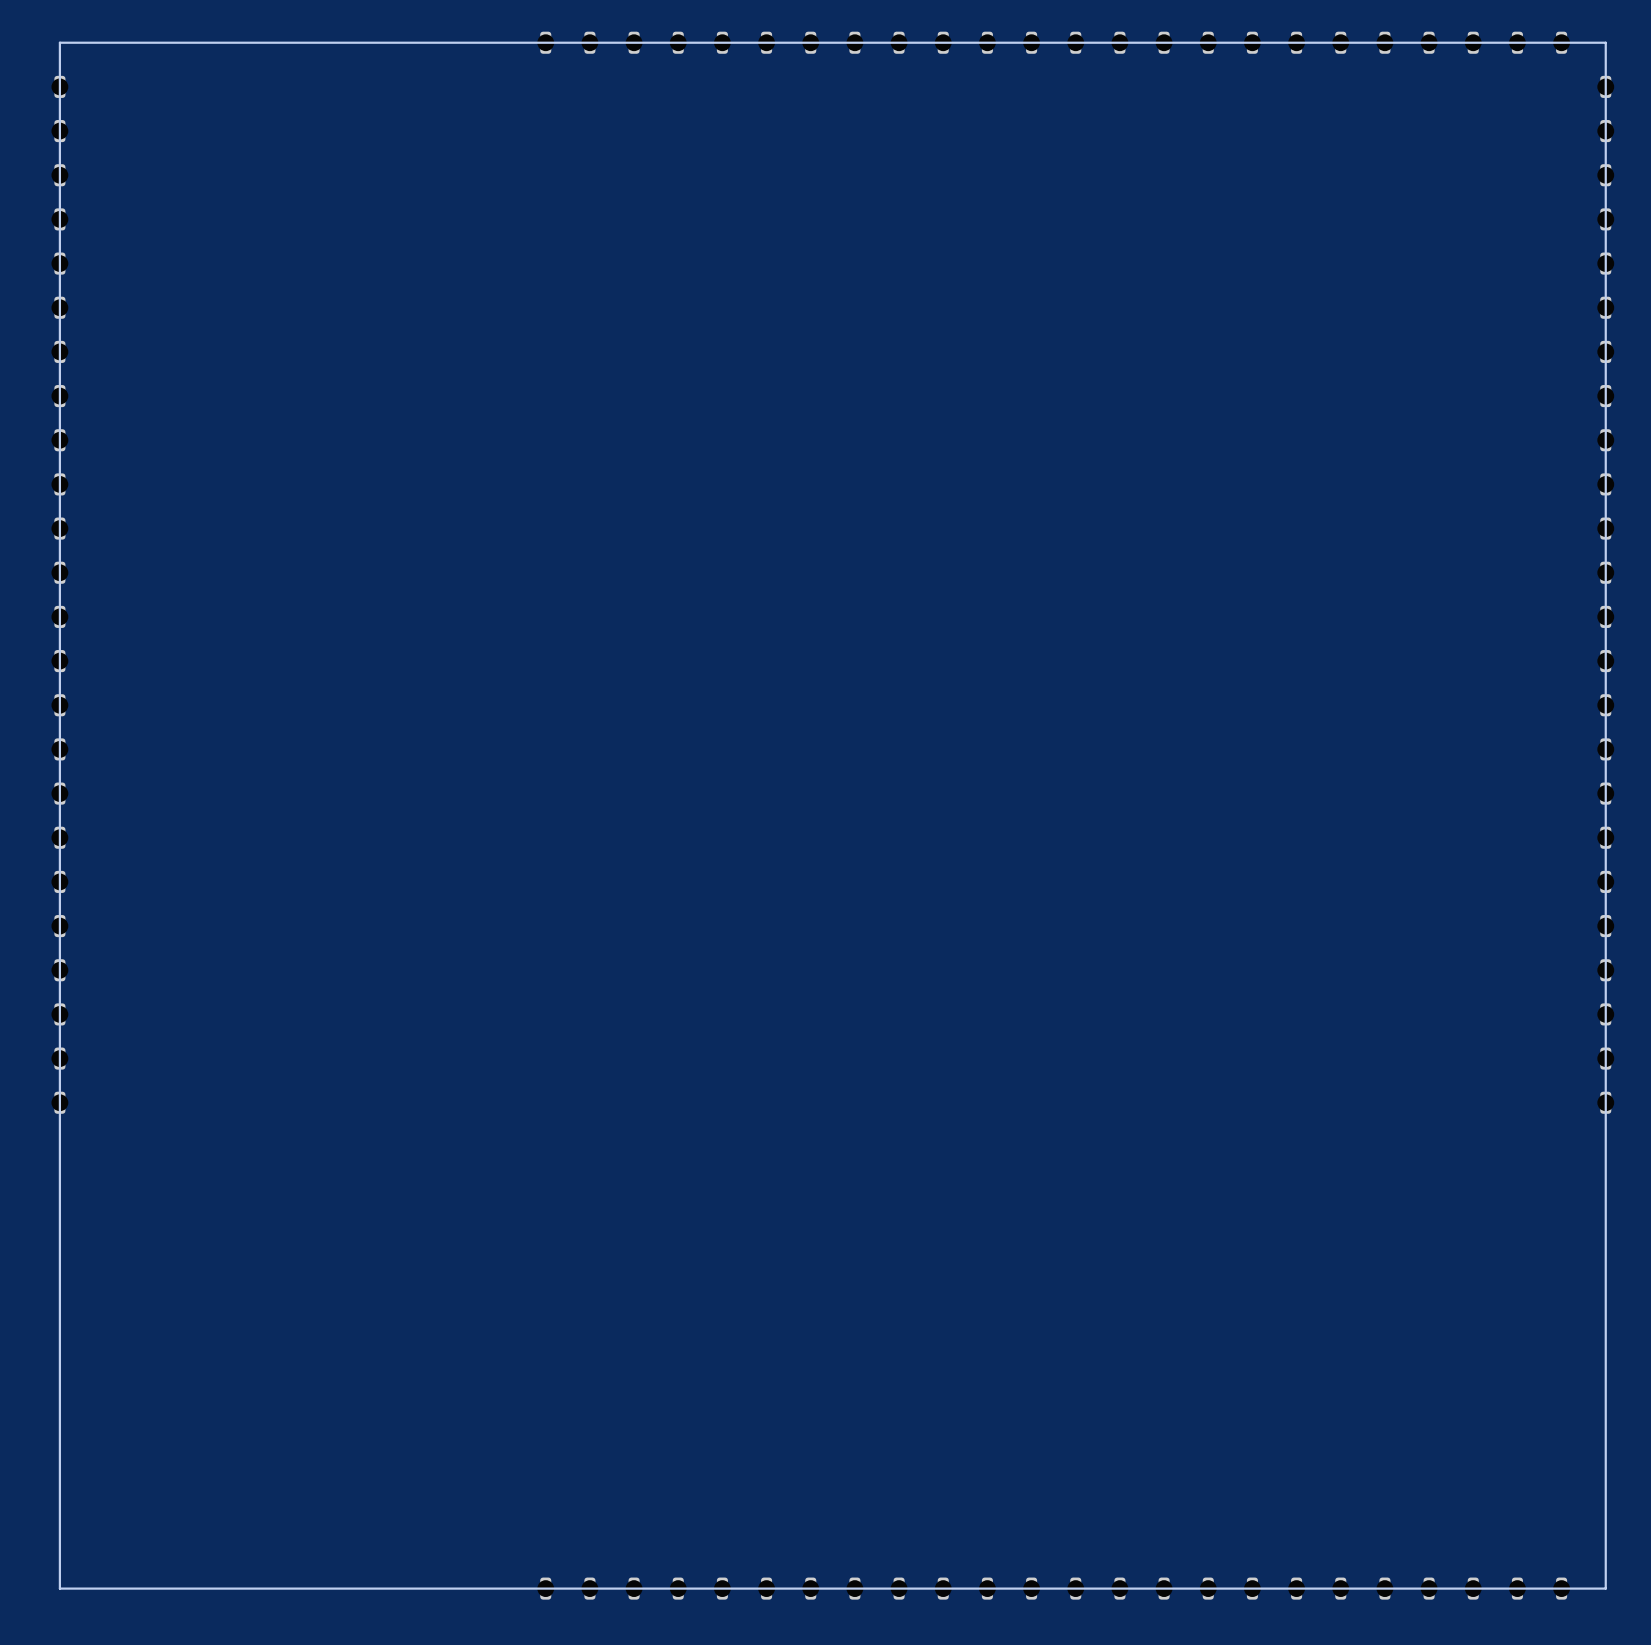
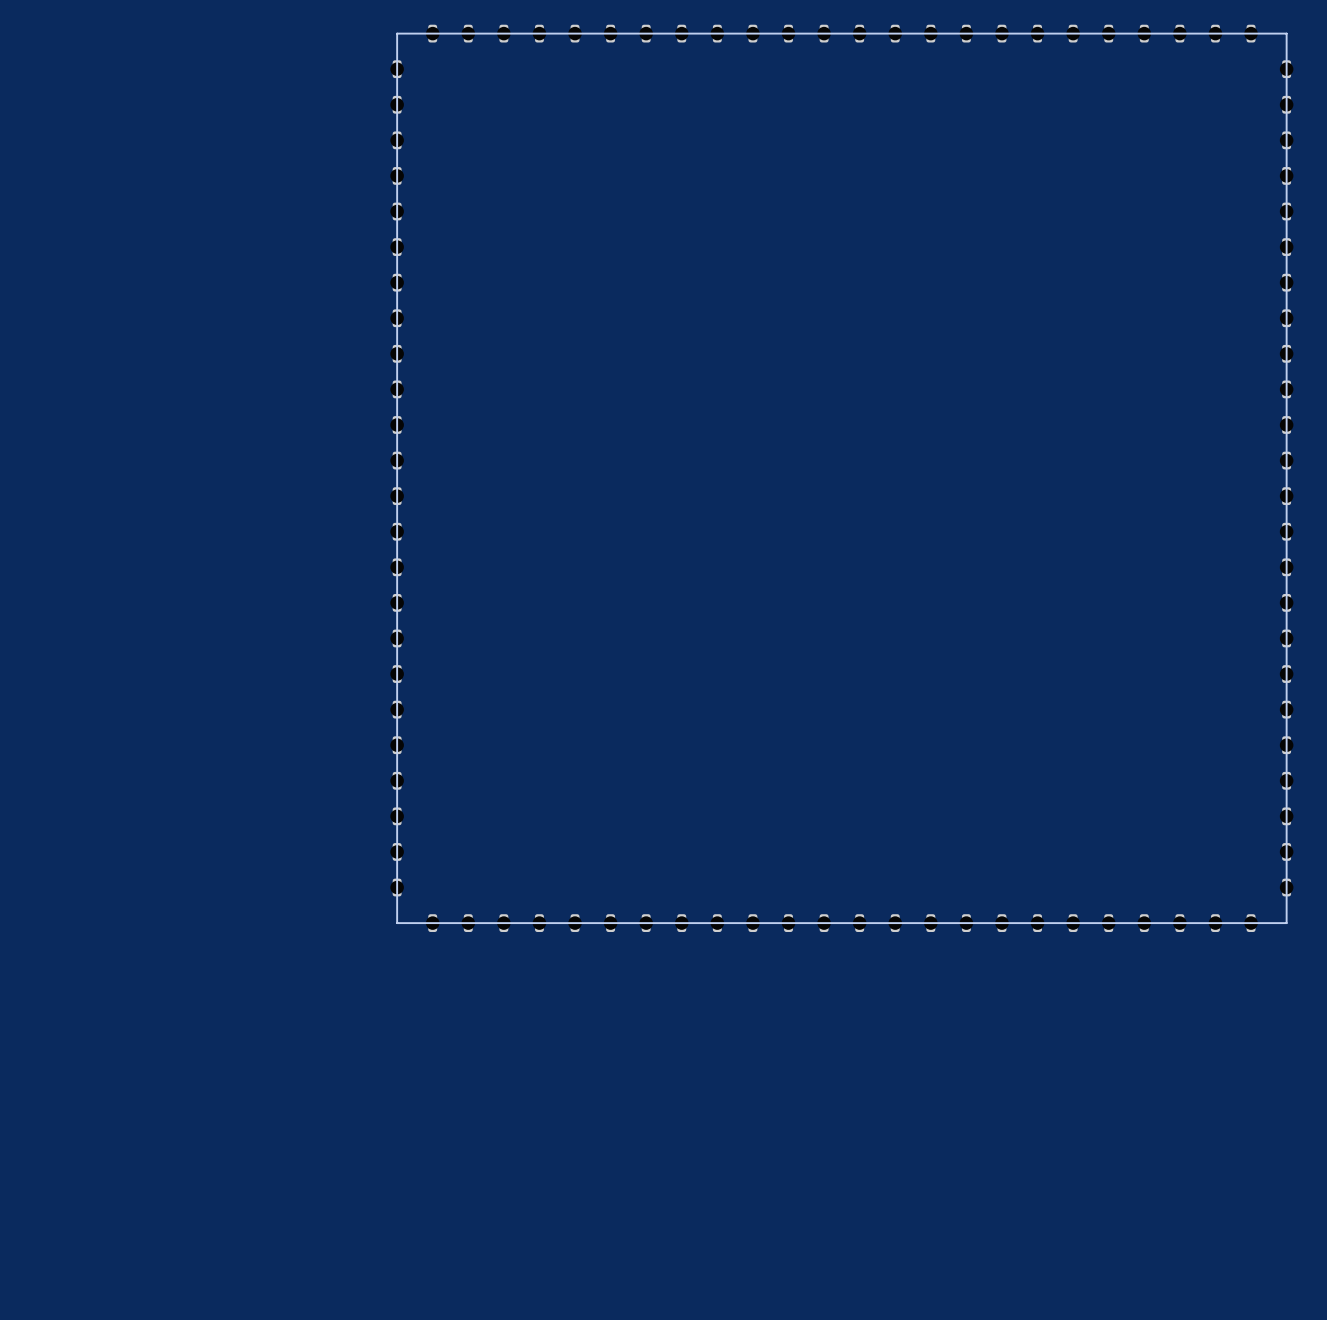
board edge: (501, 42) (59, 42) (59, 1588) (1605, 1588) (1605, 1146) -> (397, 33) (397, 923) (1286, 923)
part: (59, 86) -> none
part: none -> (397, 69)
part: (59, 131) -> none
part: none -> (397, 104)
part: (59, 175) -> none
part: none -> (397, 140)
part: (59, 219) -> none
part: none -> (397, 175)
part: (59, 263) -> none
part: none -> (397, 211)
part: (59, 307) -> none
part: none -> (397, 247)
part: (59, 351) -> none
part: none -> (397, 282)
part: (59, 396) -> none
part: none -> (397, 318)
part: (59, 440) -> none
part: none -> (397, 353)
part: (59, 484) -> none
part: none -> (397, 389)
part: (59, 528) -> none
part: none -> (397, 424)
part: (59, 572) -> none
part: none -> (397, 460)
part: (59, 616) -> none
part: none -> (397, 496)
part: (59, 661) -> none
part: none -> (397, 531)
part: (59, 705) -> none
part: none -> (397, 567)
part: (59, 749) -> none
part: none -> (397, 602)
part: (59, 793) -> none
part: none -> (397, 638)
part: (59, 837) -> none
part: none -> (397, 674)
part: (59, 881) -> none
part: none -> (397, 709)
part: (59, 926) -> none
part: none -> (397, 745)
part: (59, 970) -> none
part: none -> (397, 780)
part: (59, 1014) -> none
part: none -> (397, 816)
part: (59, 1058) -> none
part: none -> (397, 851)
part: (59, 1102) -> none
part: none -> (397, 887)
part: none -> (432, 923)
part: none -> (468, 923)
part: none -> (503, 923)
part: none -> (539, 923)
part: none -> (575, 923)
part: none -> (610, 923)
part: none -> (646, 923)
part: none -> (681, 923)
part: none -> (717, 923)
part: none -> (752, 923)
part: none -> (788, 923)
part: none -> (824, 923)
part: none -> (859, 923)
part: none -> (895, 923)
part: none -> (930, 923)
part: none -> (966, 923)
part: none -> (1001, 923)
part: none -> (1037, 923)
part: none -> (1073, 923)
part: none -> (1108, 923)
part: none -> (1144, 923)
part: none -> (1179, 923)
part: none -> (1215, 923)
part: none -> (1251, 923)
part: (545, 1588) -> none
part: (589, 1588) -> none
part: (634, 1588) -> none
part: (678, 1588) -> none
part: (722, 1588) -> none
part: (766, 1588) -> none
part: (810, 1588) -> none
part: (854, 1588) -> none
part: (899, 1588) -> none
part: (943, 1588) -> none
part: (987, 1588) -> none
part: (1031, 1588) -> none
part: (1075, 1588) -> none
part: (1119, 1588) -> none
part: (1164, 1588) -> none
part: (1208, 1588) -> none
part: (1252, 1588) -> none
part: (1296, 1588) -> none
part: (1340, 1588) -> none
part: (1384, 1588) -> none
part: (1429, 1588) -> none
part: (1473, 1588) -> none
part: (1517, 1588) -> none
part: (1561, 1588) -> none

